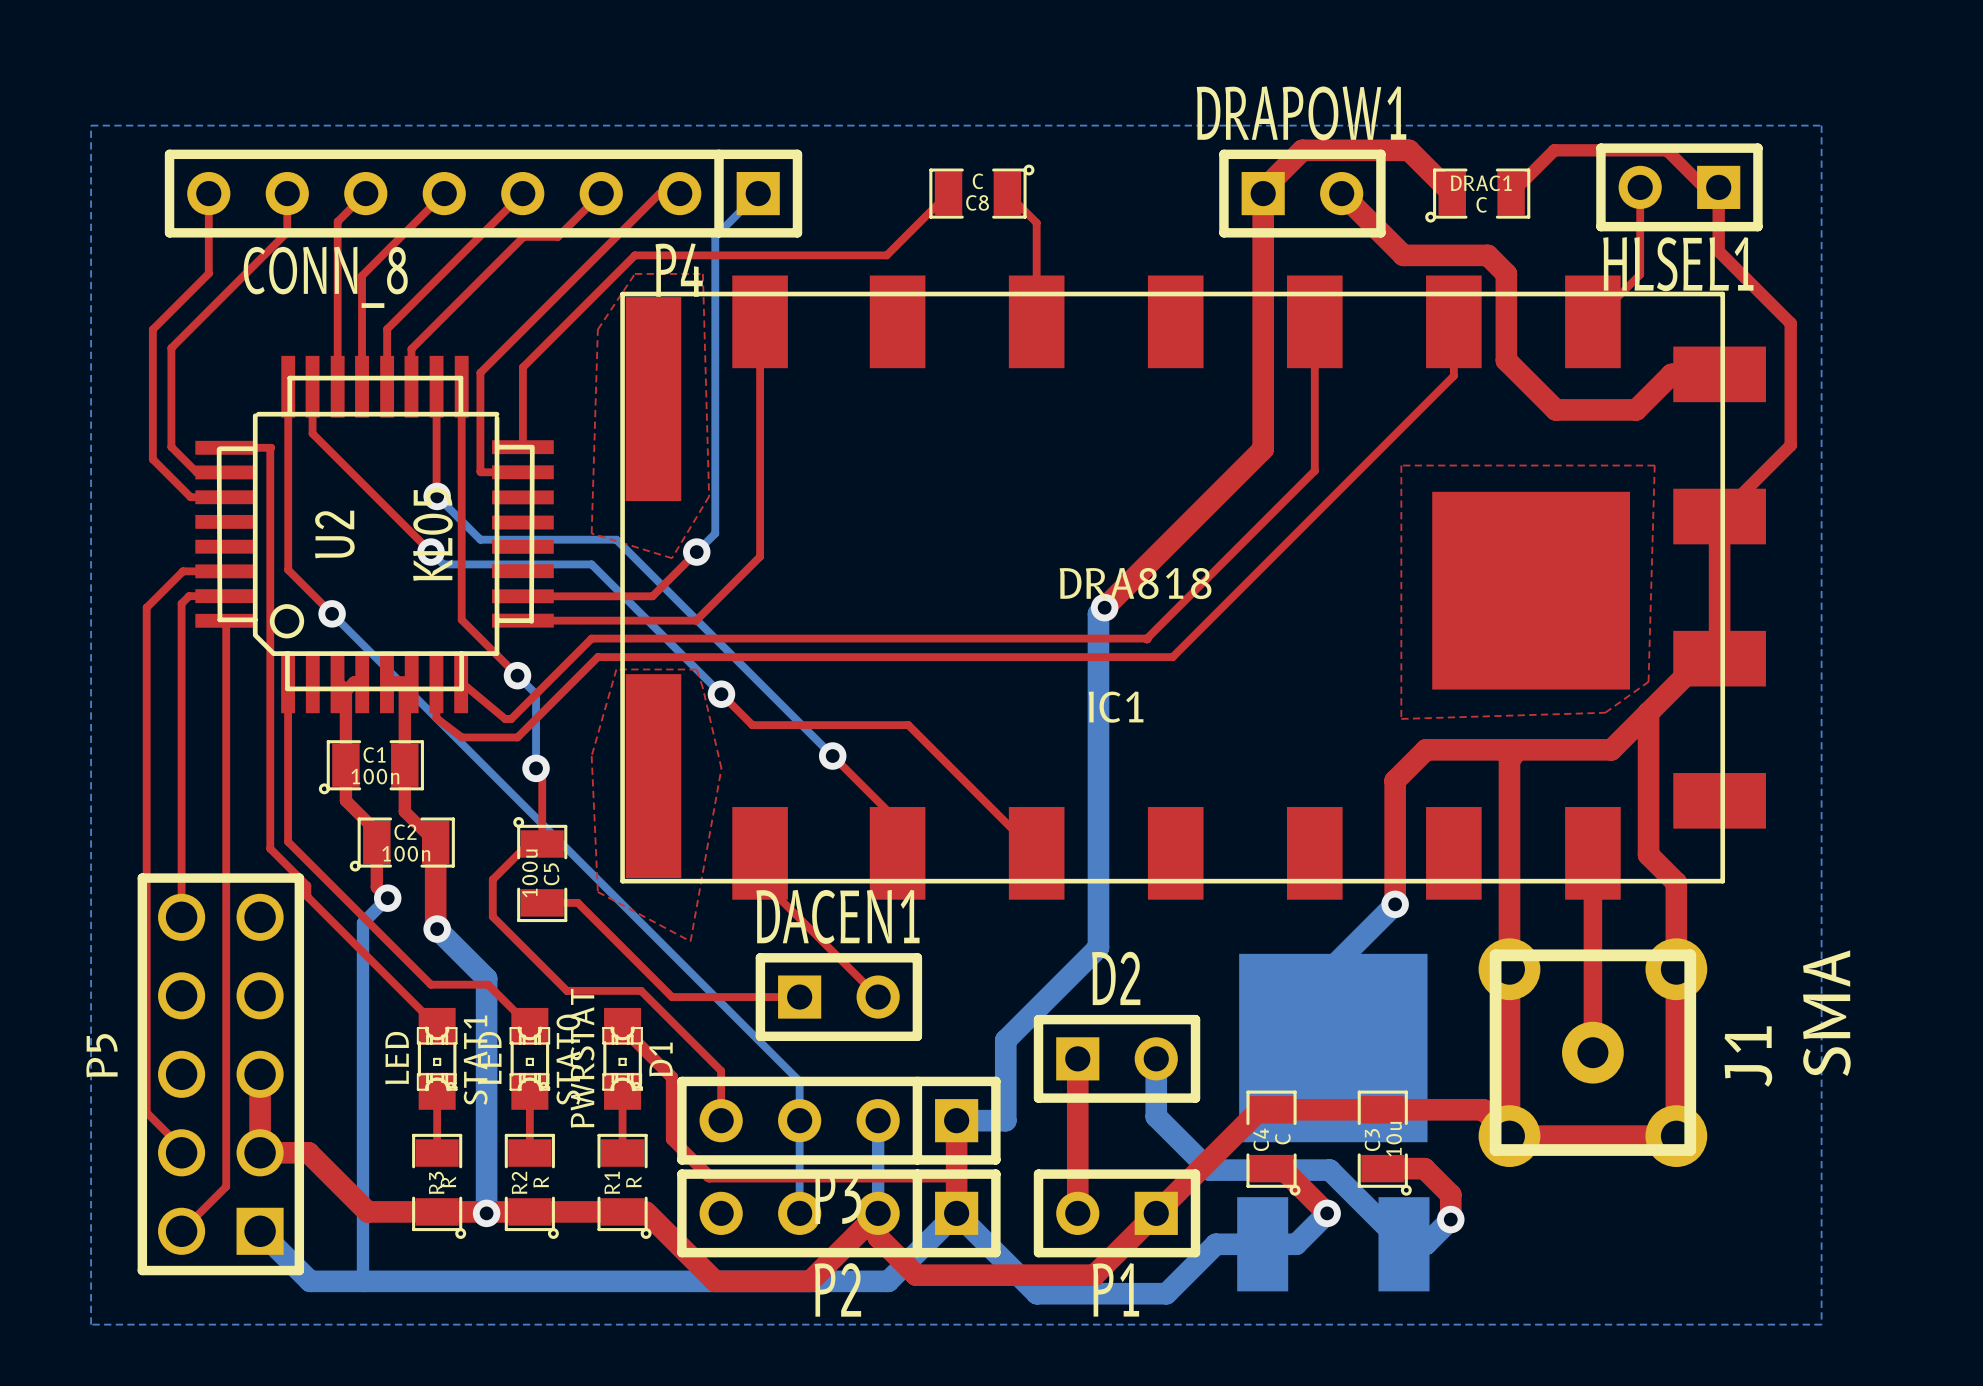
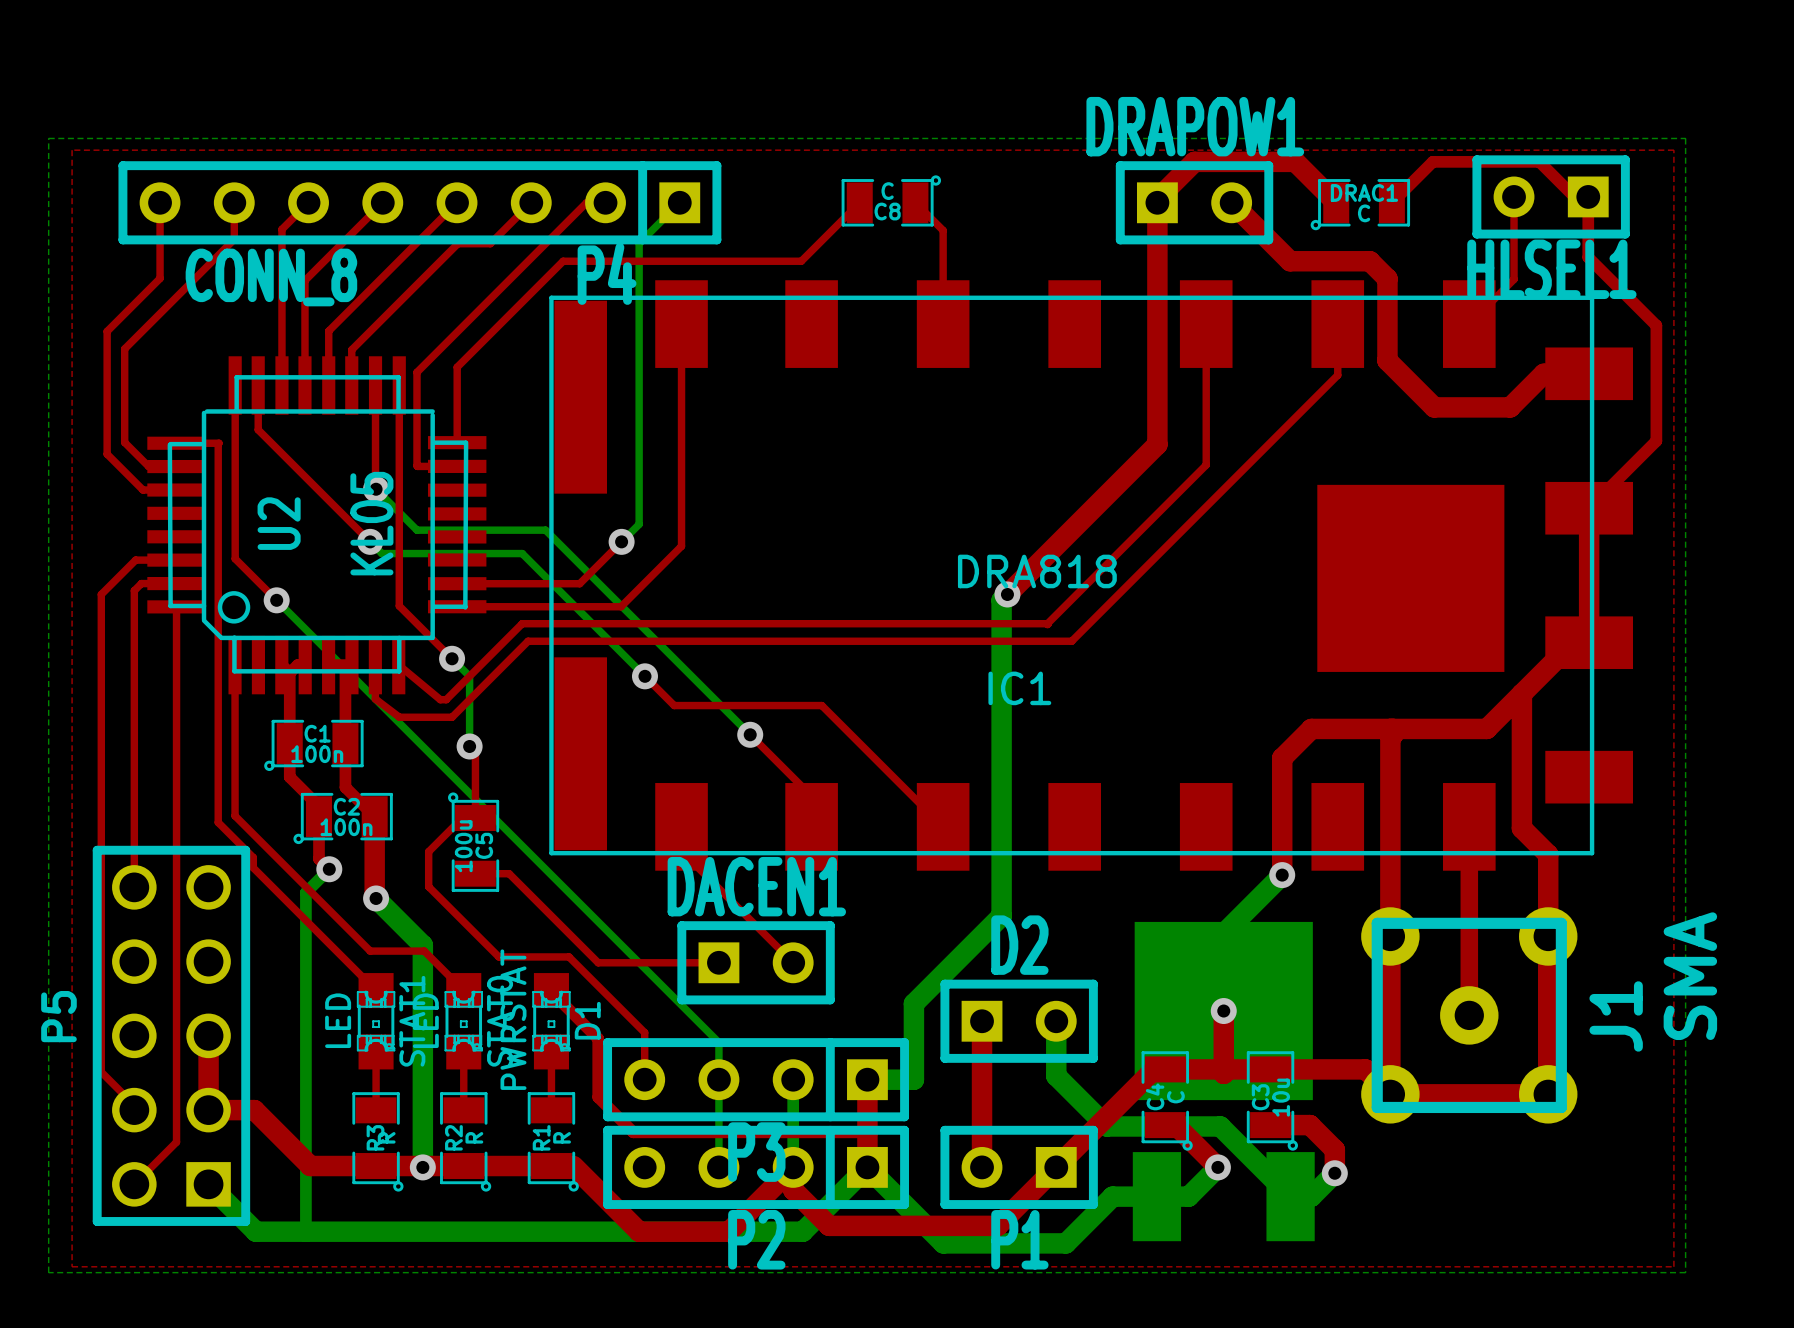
top zone outline: none -> (72, 150) (1673, 150) (1673, 1266) (72, 1266) (72, 150)
top zone outline: (634, 273) (597, 329) (591, 533) (672, 558) (709, 496) (702, 273) (634, 273) -> none
top zone outline: (1401, 465) (1401, 718) (1605, 712) (1648, 681) (1654, 465) (1401, 465) -> none
top zone outline: (616, 669) (696, 669) (702, 688) (721, 768) (690, 941) (597, 891) (591, 756) (616, 669) -> none
top track: none -> (1223, 1011) (1223, 1073)
via: none -> (1223, 1011)

